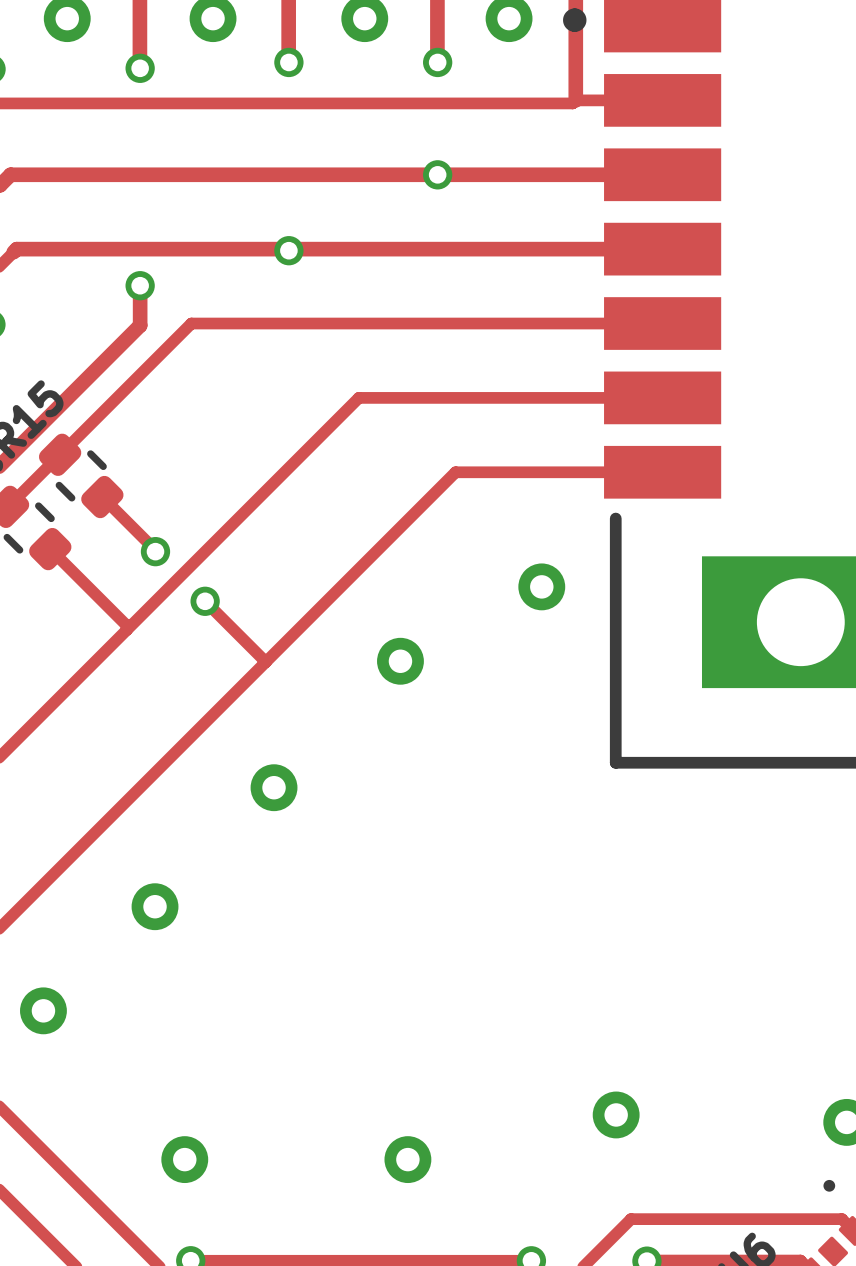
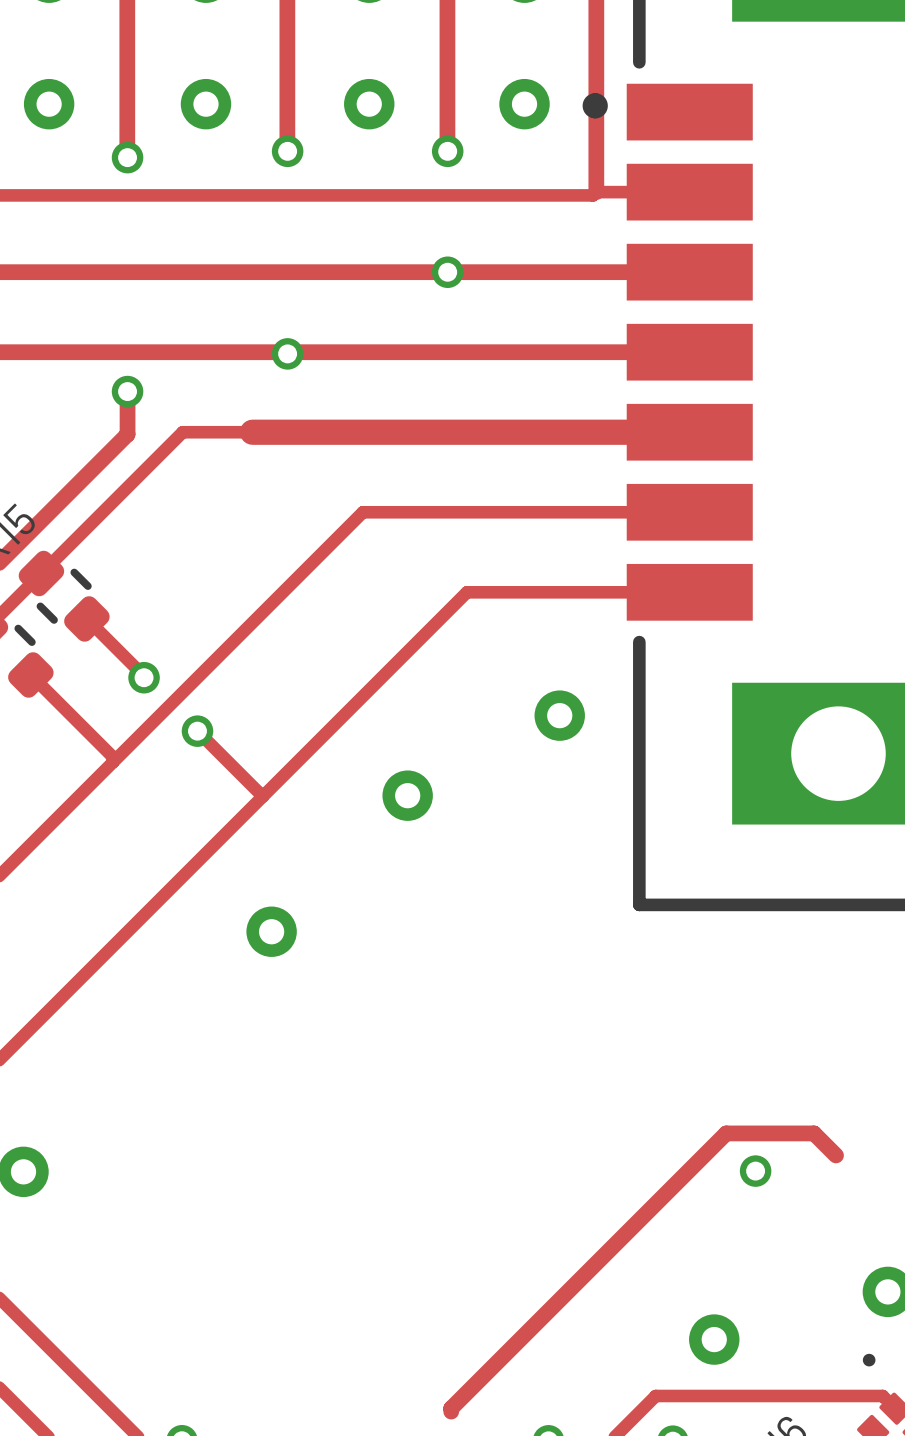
track width: thin (256, 323) (662, 323) -> thick (252, 432) (689, 432)
via: (155, 906) -> none
track: none -> (836, 1155) (813, 1133) (726, 1133) (451, 1408) (451, 1411)
via: none -> (755, 1171)
via position: (616, 1114) -> (714, 1339)
via: (184, 1159) -> none
via: (407, 1159) -> none

